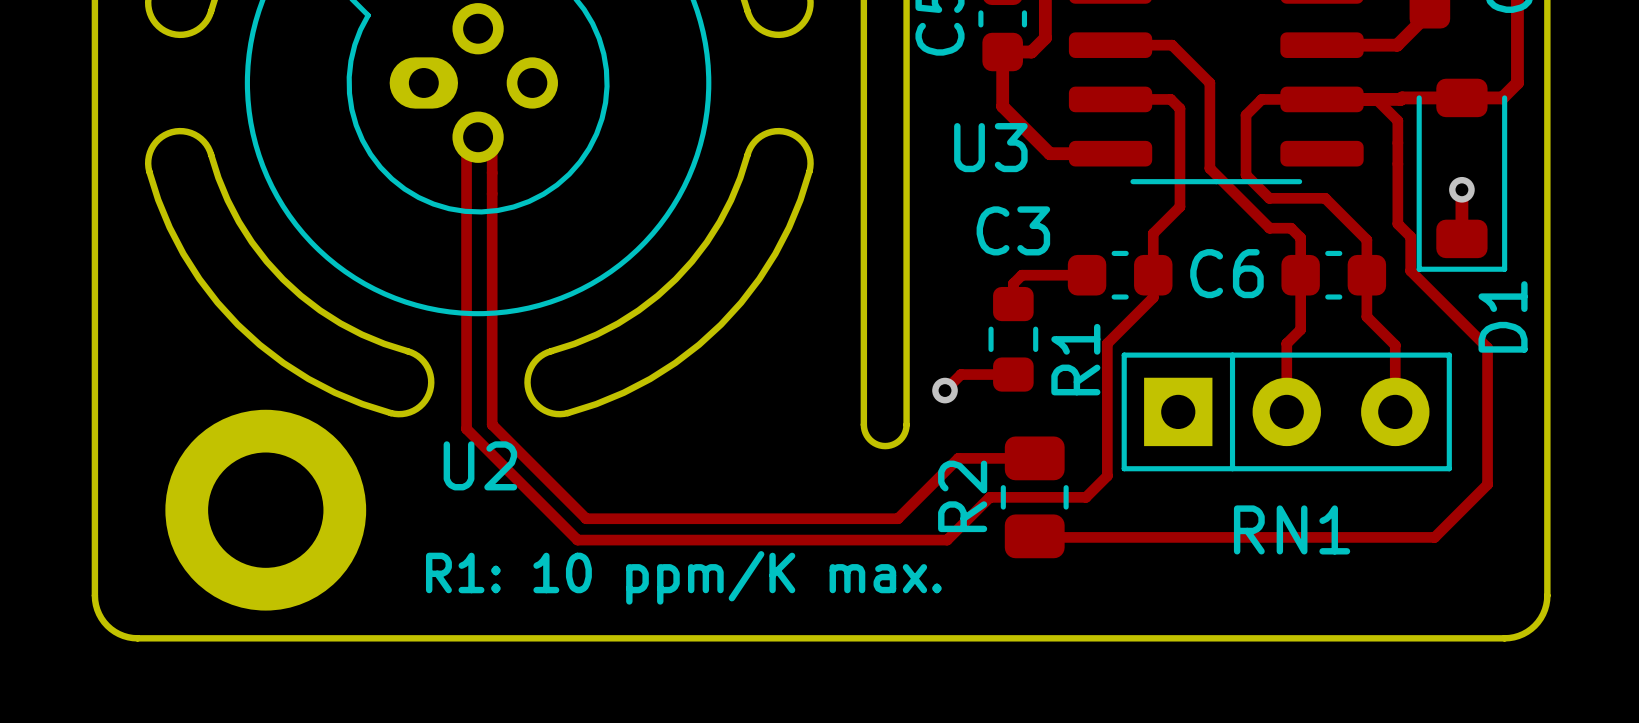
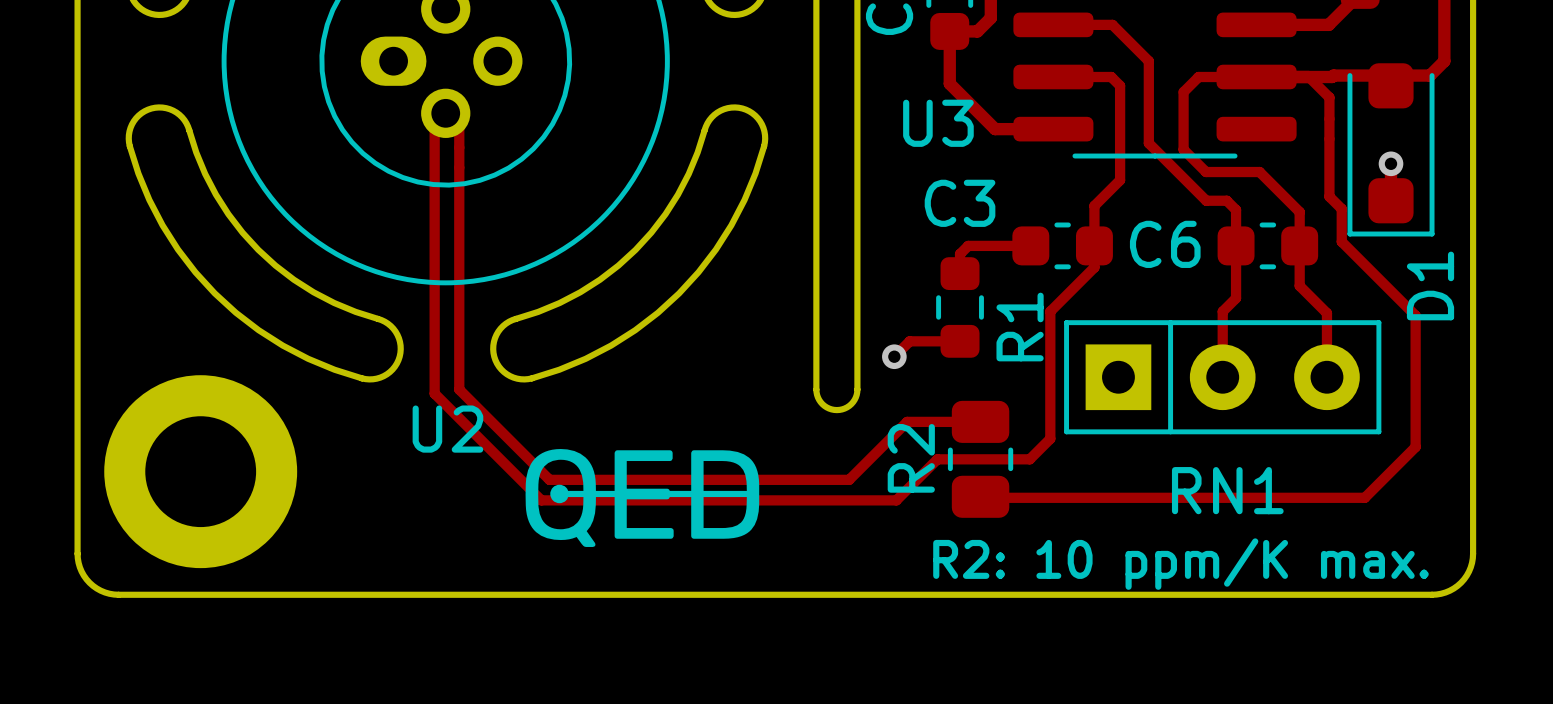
D1 footprint: [1416, 78, 1508, 272] -> [1347, 63, 1435, 237]
drawing: none -> [525, 449, 760, 547]
part position: (265, 510) -> (200, 471)
text: R1: 10 ppm/K max. (683, 577) -> R2: 10 ppm/K max. (1180, 564)

